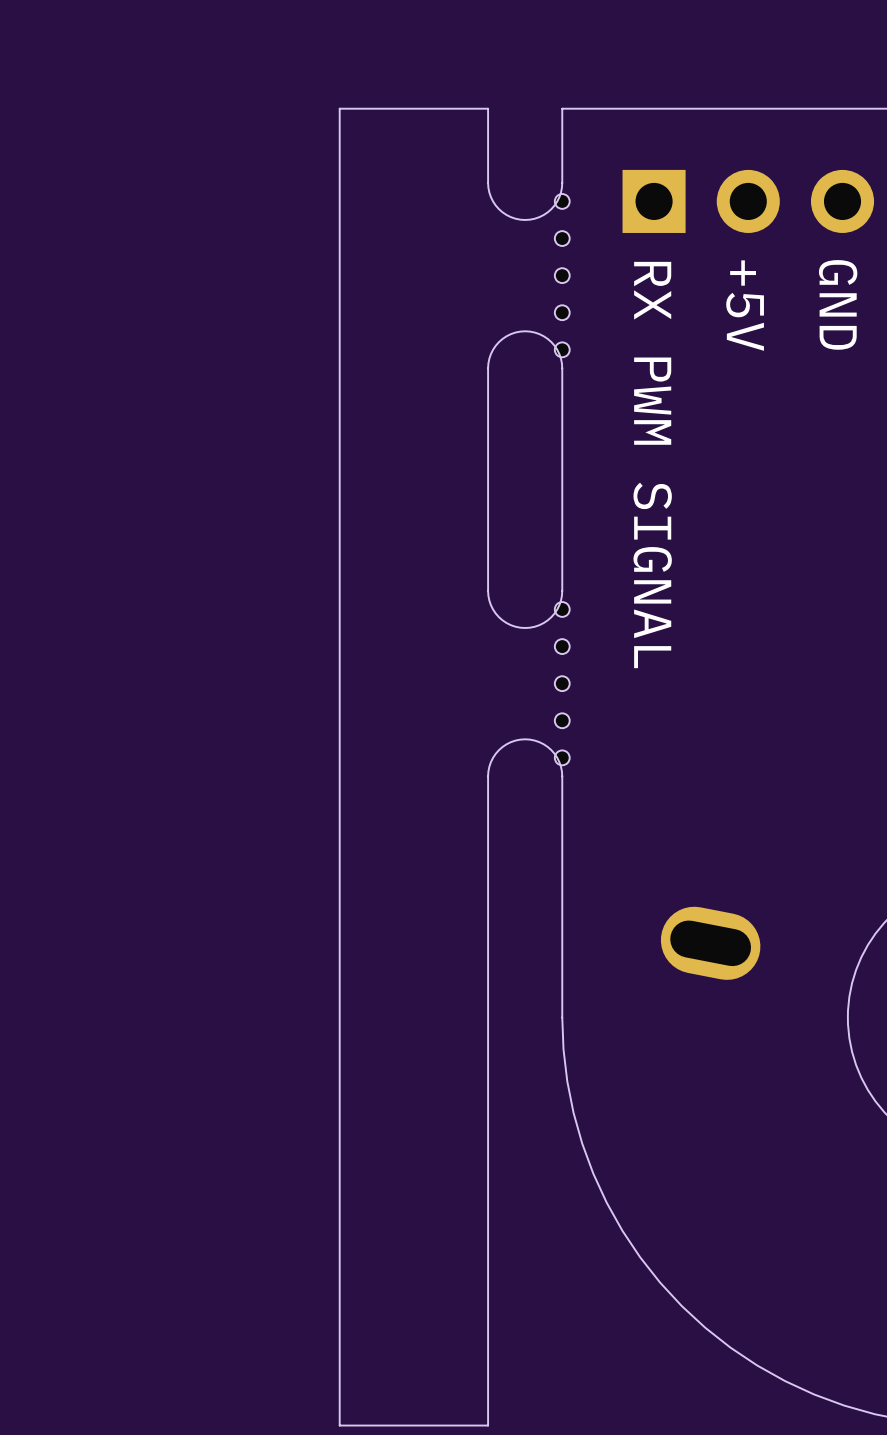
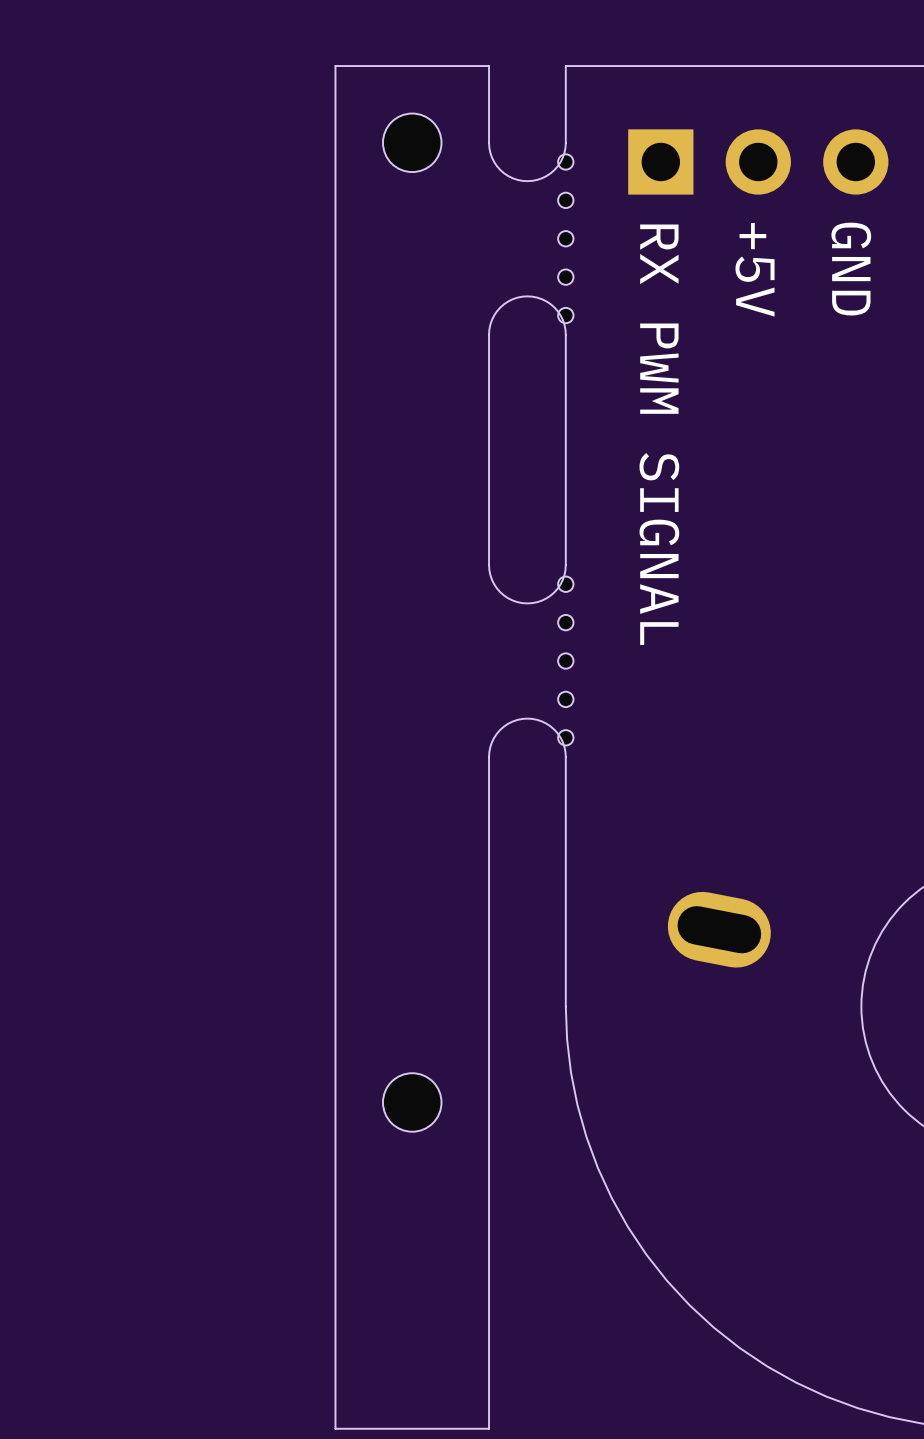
part: none -> (412, 142)
part: none -> (412, 1102)

